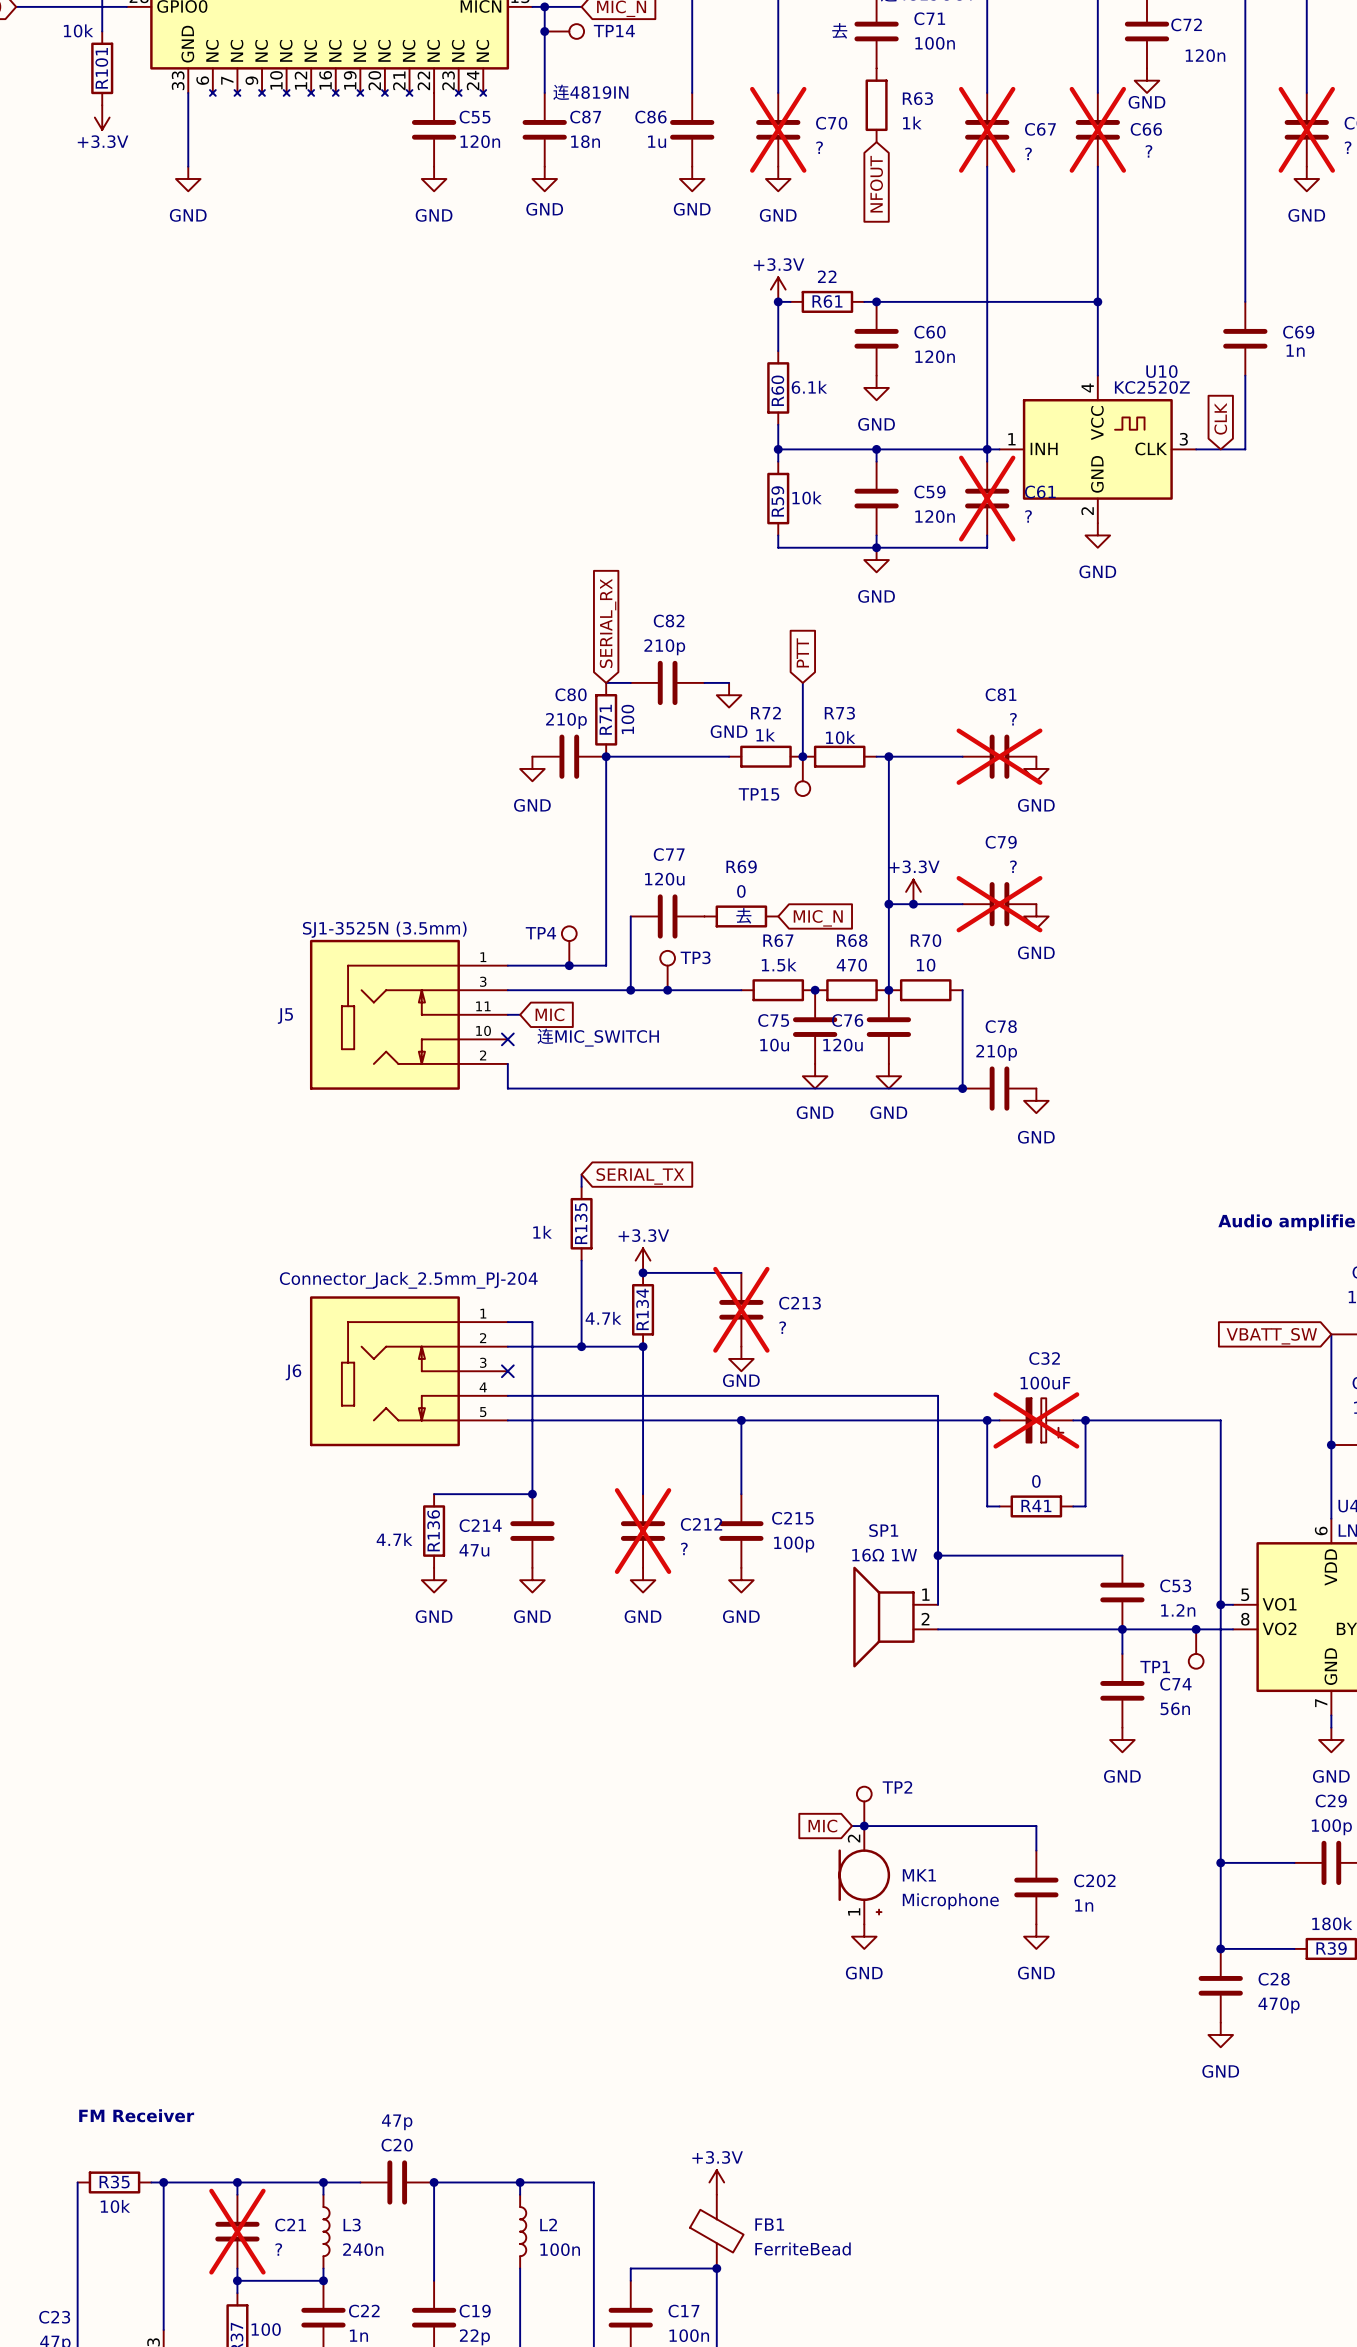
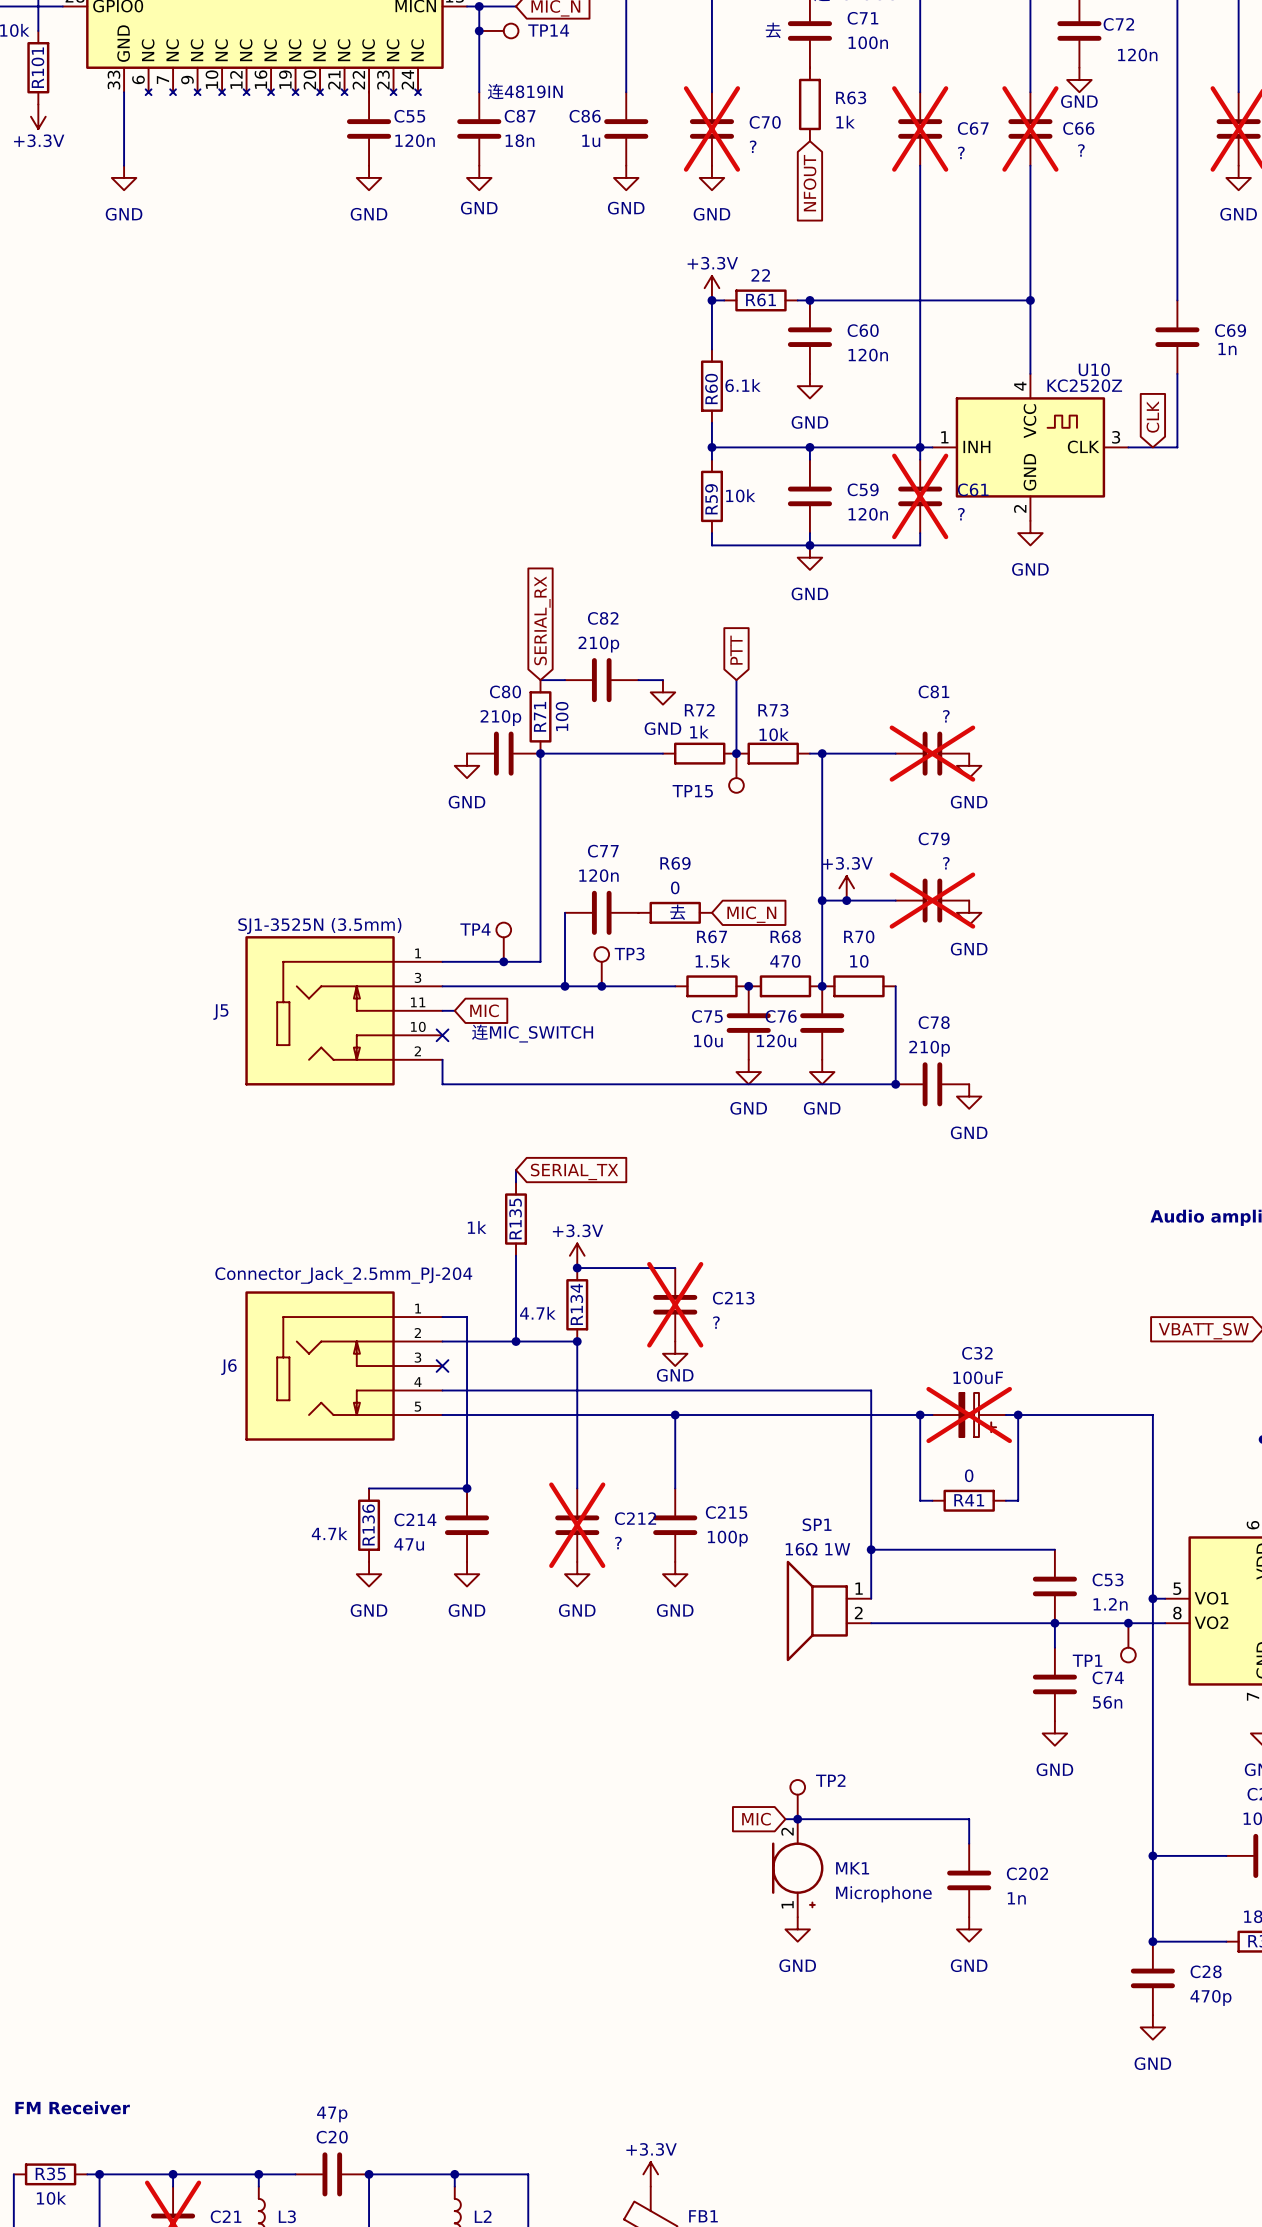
C77 value: 120u (664, 879) -> 120n (598, 875)

